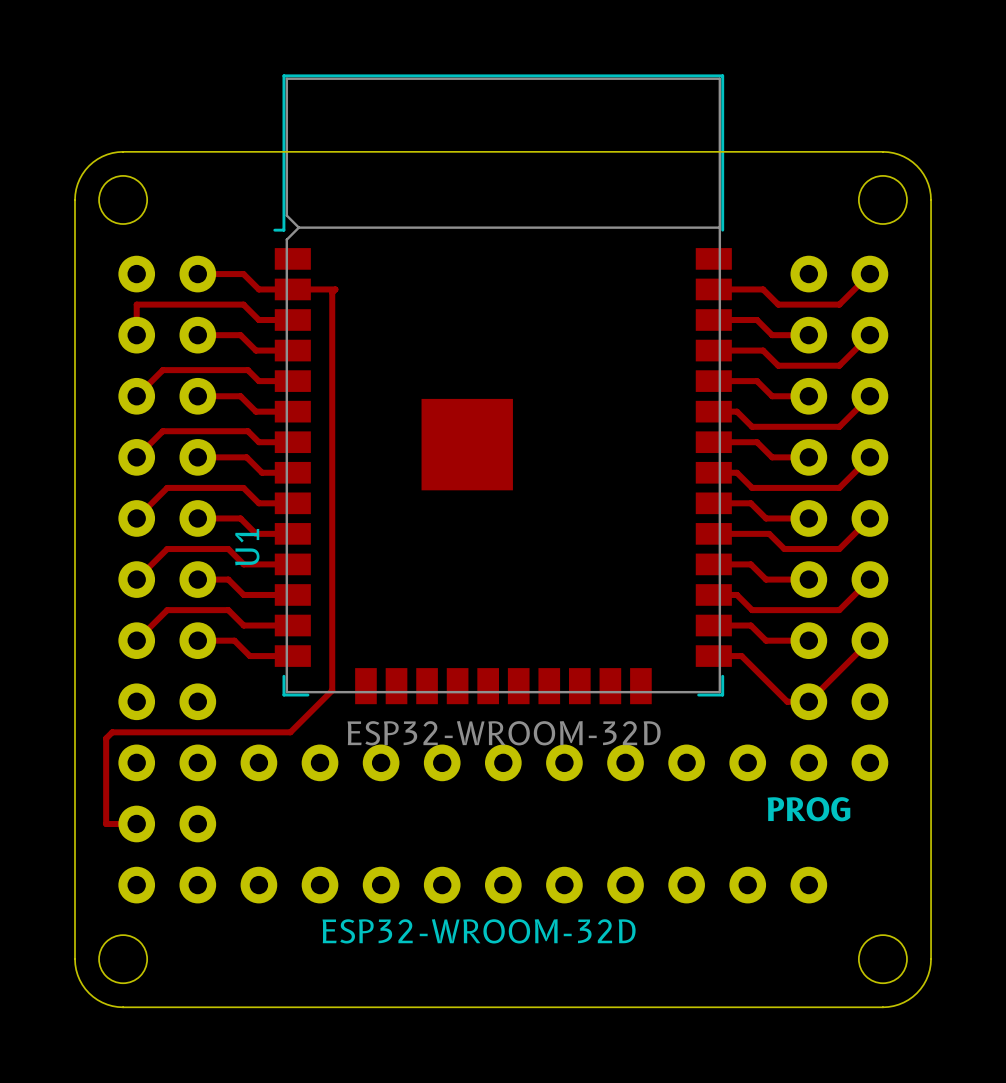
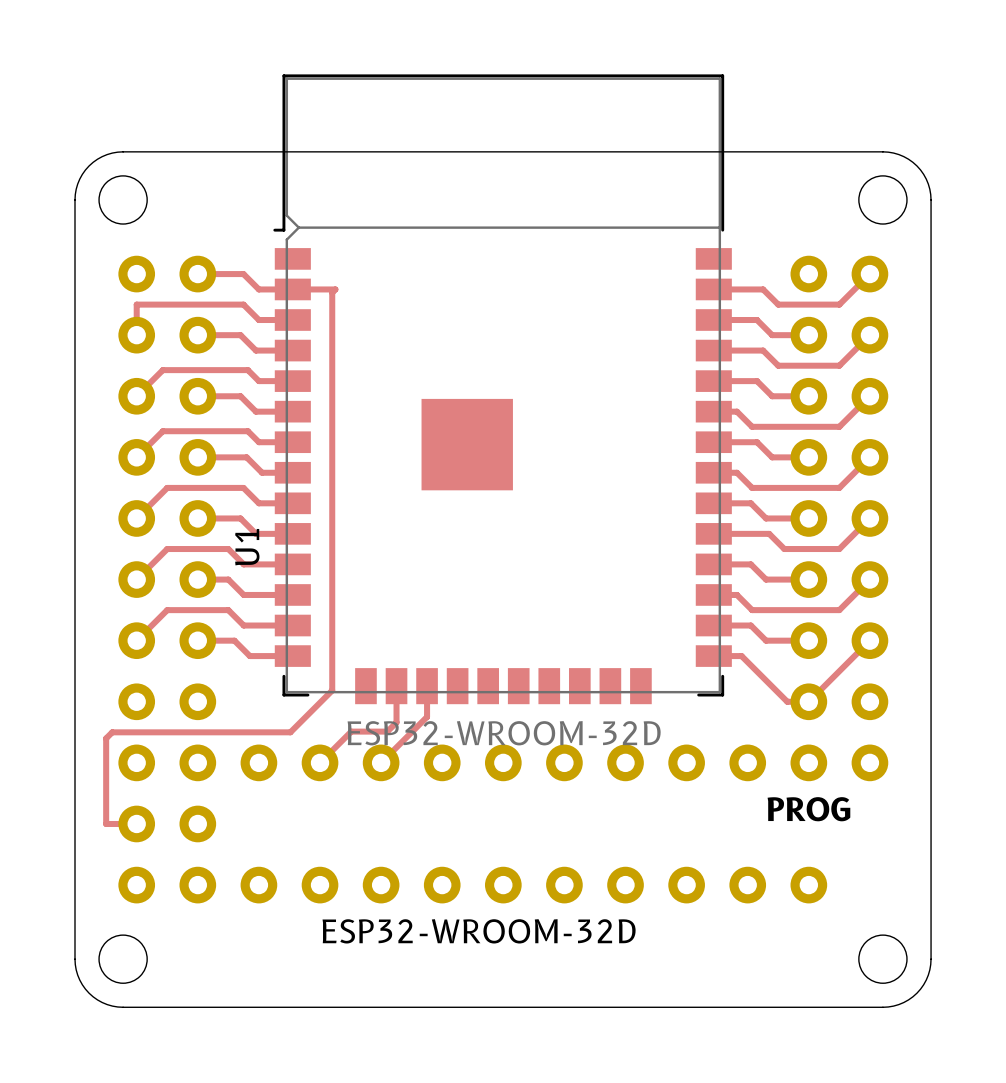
track: none -> (396, 686) (396, 722) (387, 731) (351, 731) (320, 762)
track: none -> (427, 686) (427, 716) (381, 762)

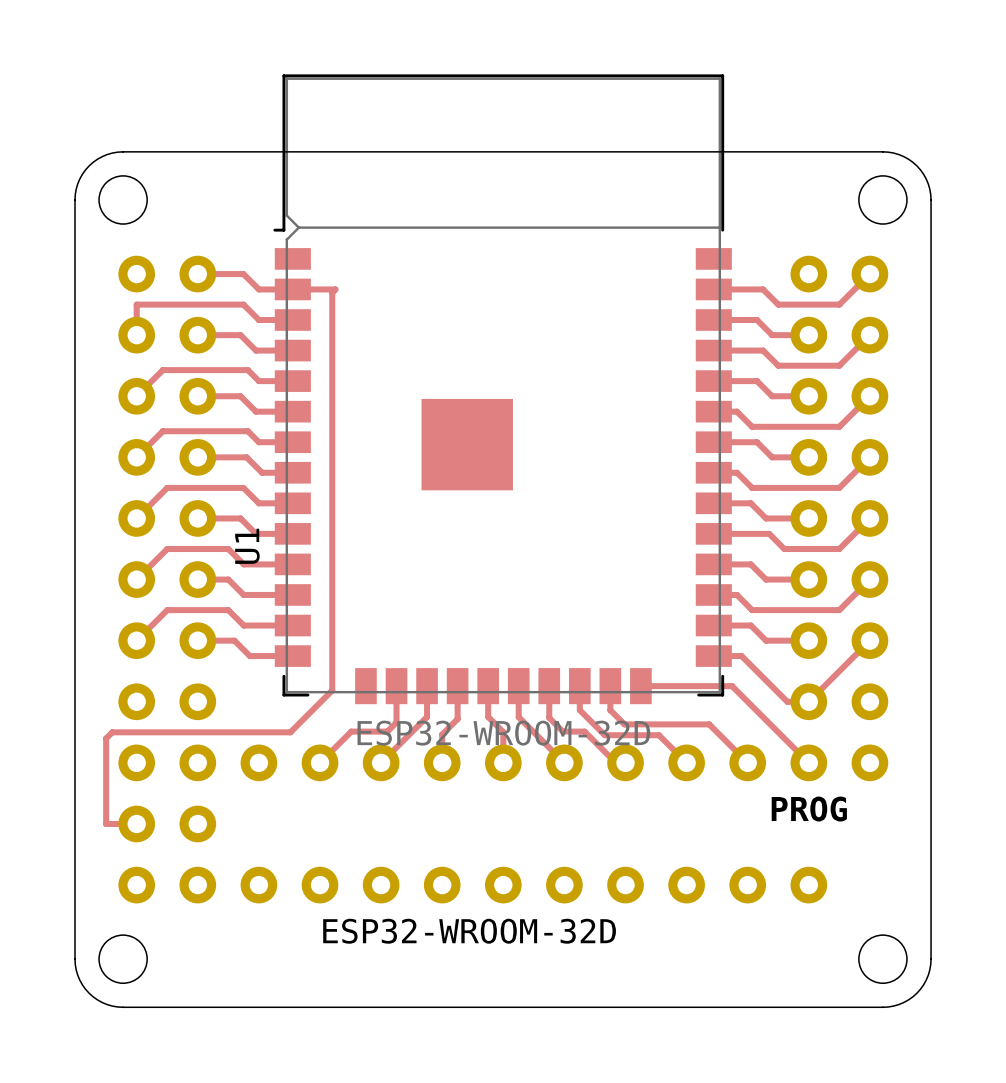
track: none -> (457, 686) (457, 719) (442, 734) (442, 762)
track: none -> (488, 686) (488, 716) (503, 732) (503, 762)
track: none -> (518, 686) (518, 717) (564, 762)
track: none -> (549, 686) (549, 717) (562, 731) (584, 731) (615, 762) (625, 762)
track: none -> (579, 686) (579, 710) (604, 735) (658, 735) (686, 762)
track: none -> (610, 686) (610, 710) (624, 724) (709, 724) (747, 762)
track: none -> (640, 686) (732, 686) (808, 762)

